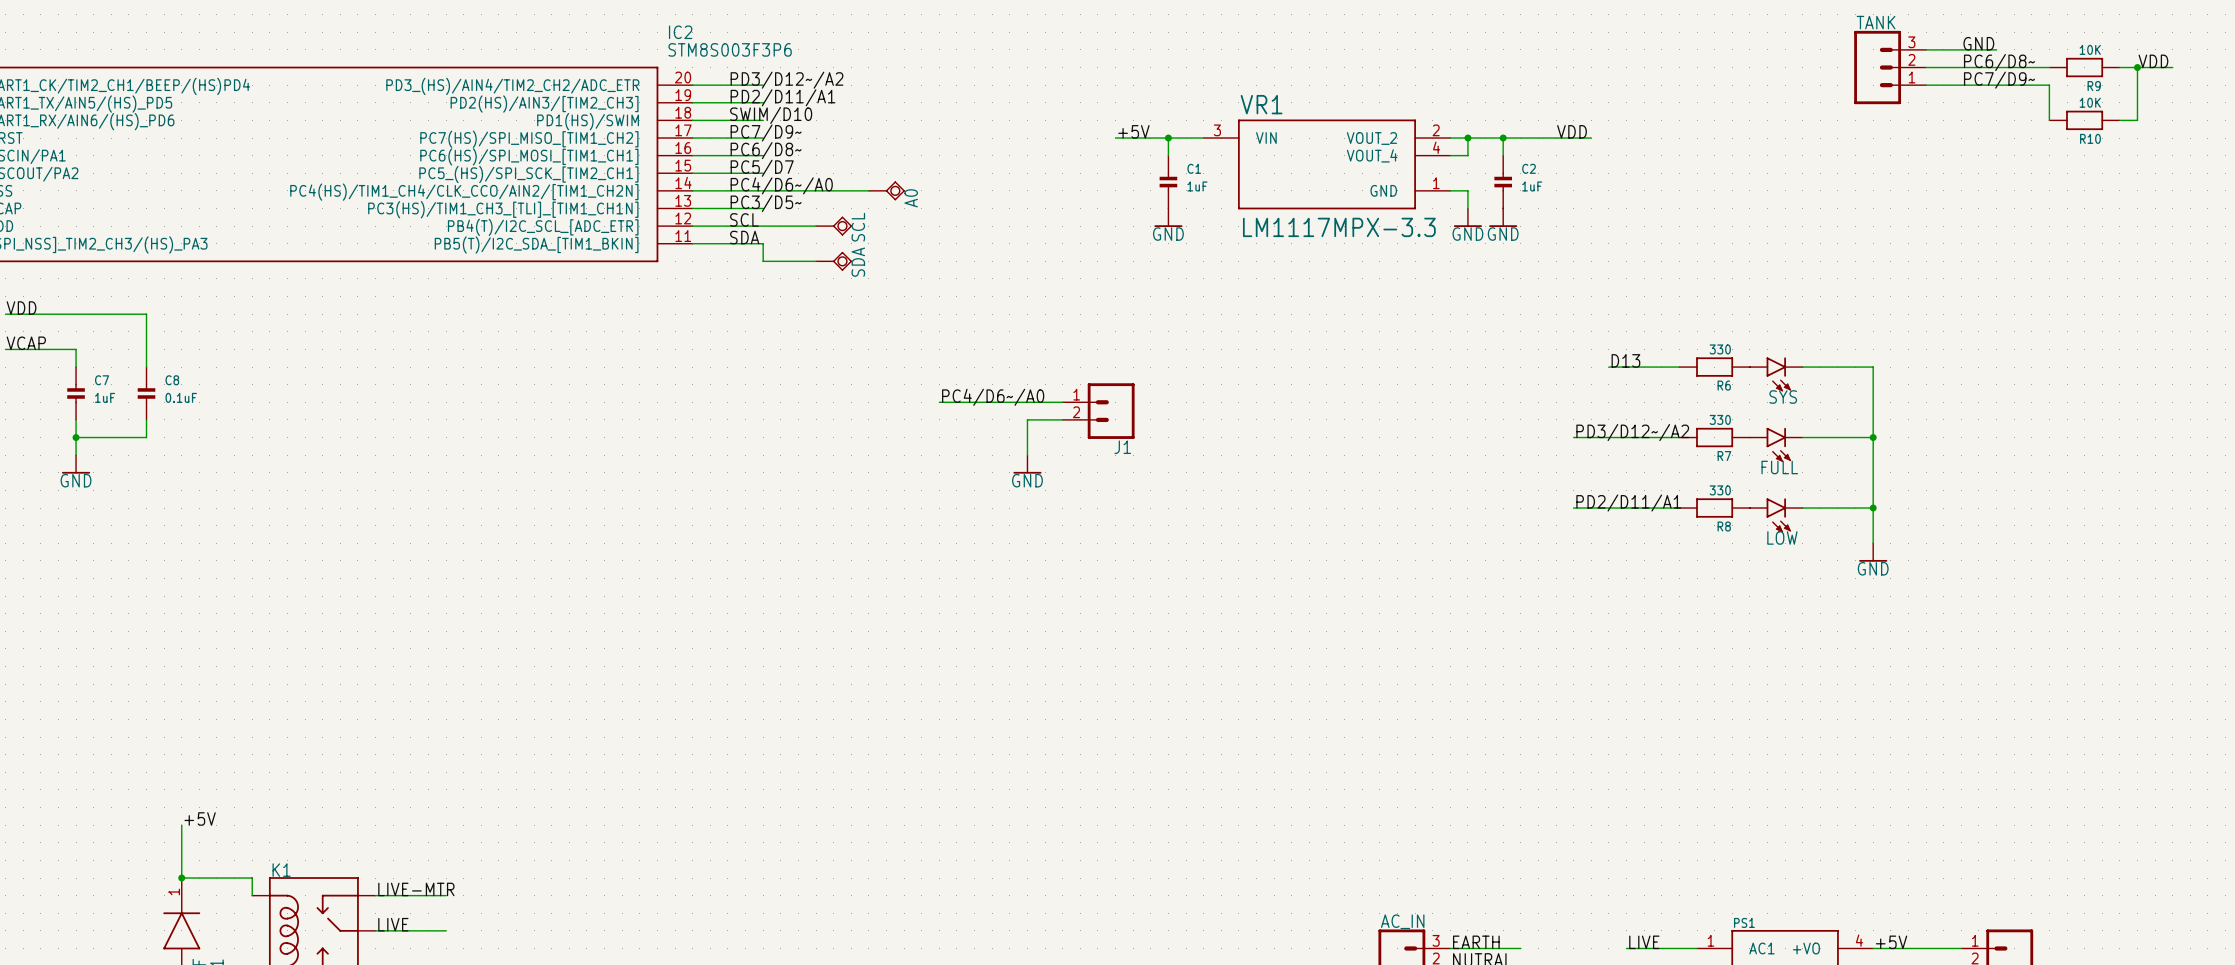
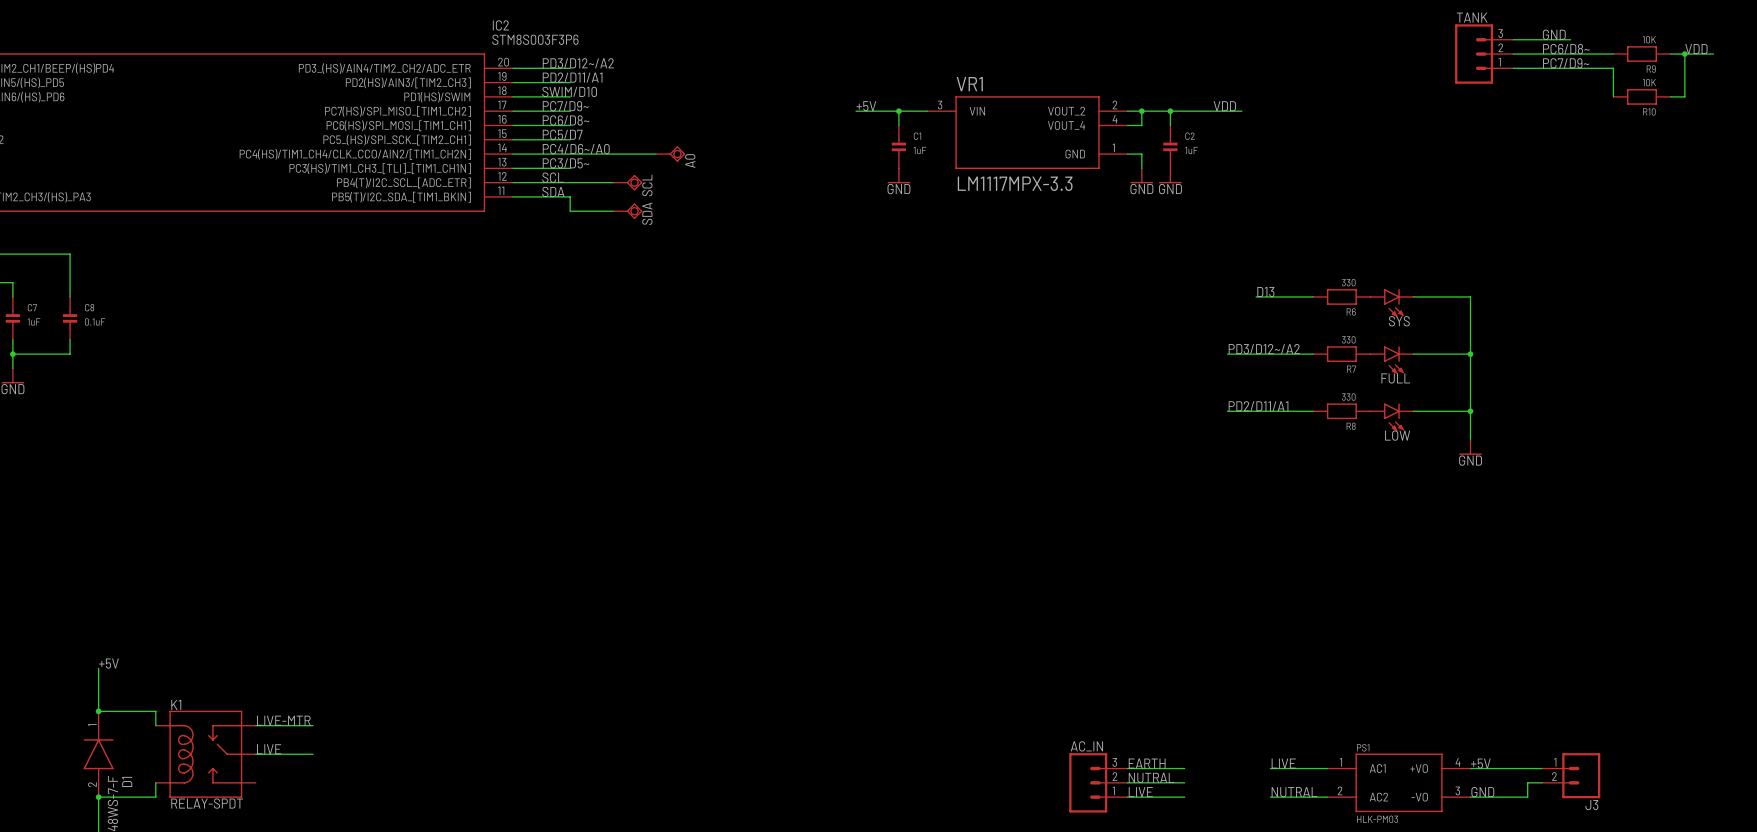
label: PC4/D6~/A0 (993, 397) -> none
wire: (939, 402) (1062, 402) -> none
J1: (1098, 411) -> none
wire: (1062, 419) (1027, 419) (1027, 455) -> none
power symbol: GND (1027, 464) -> none

